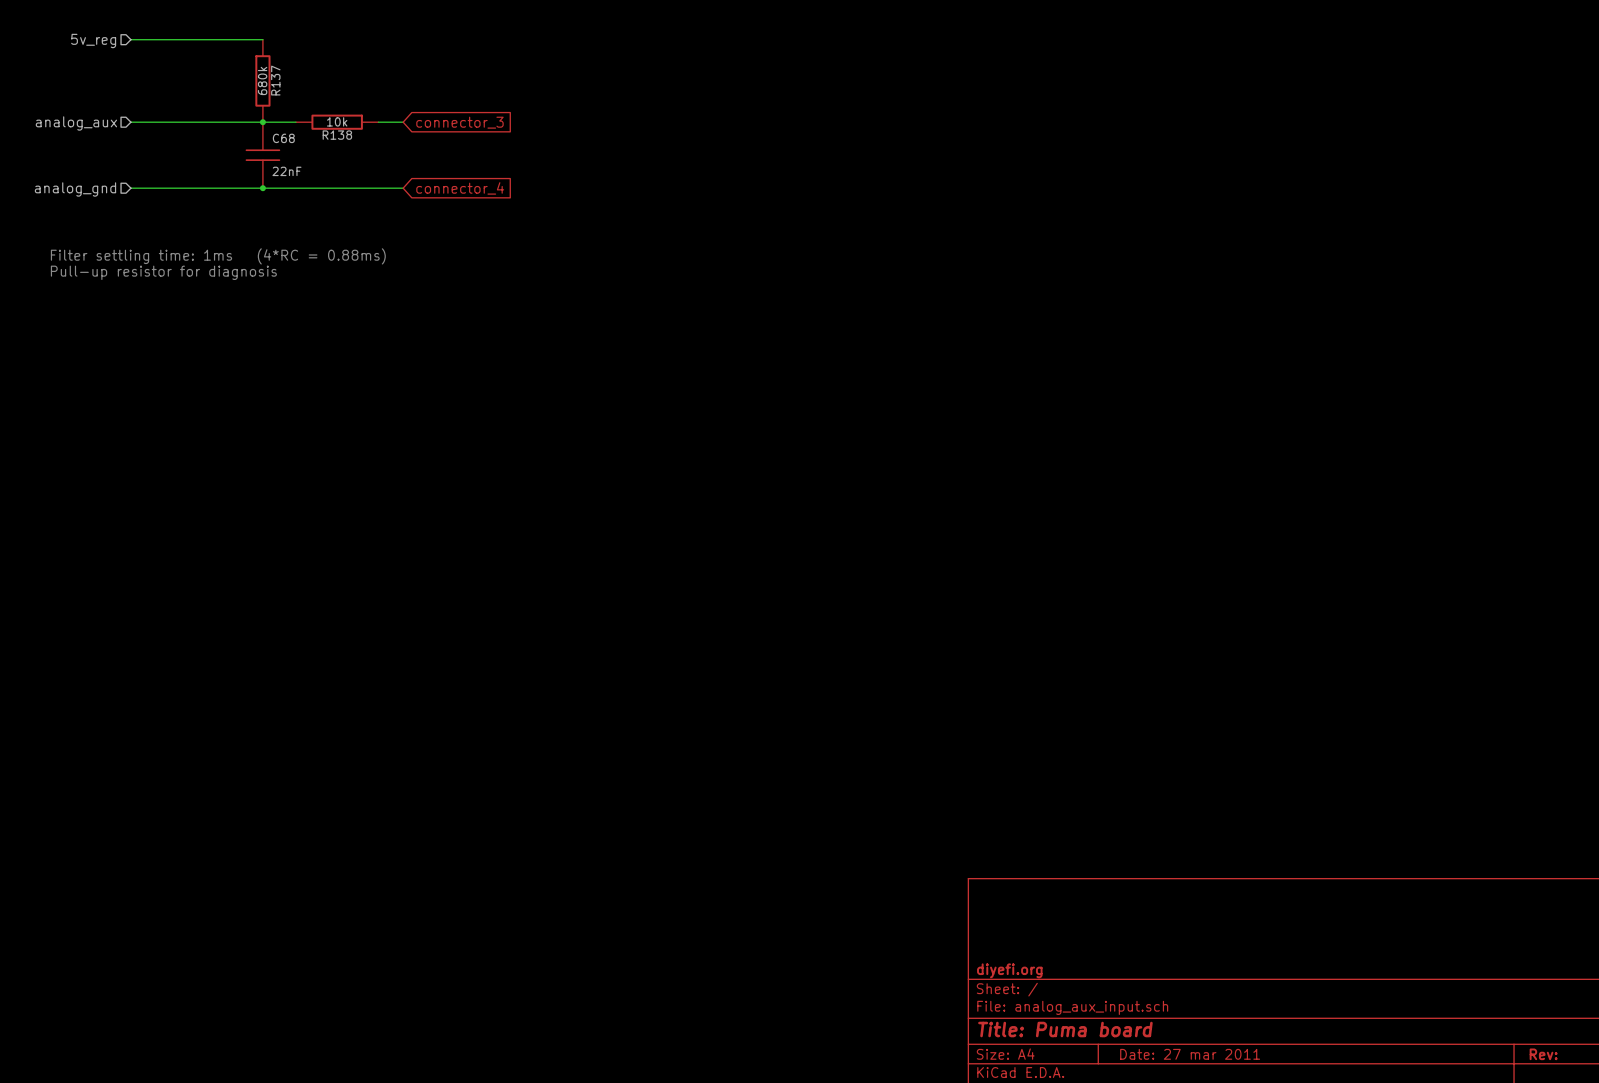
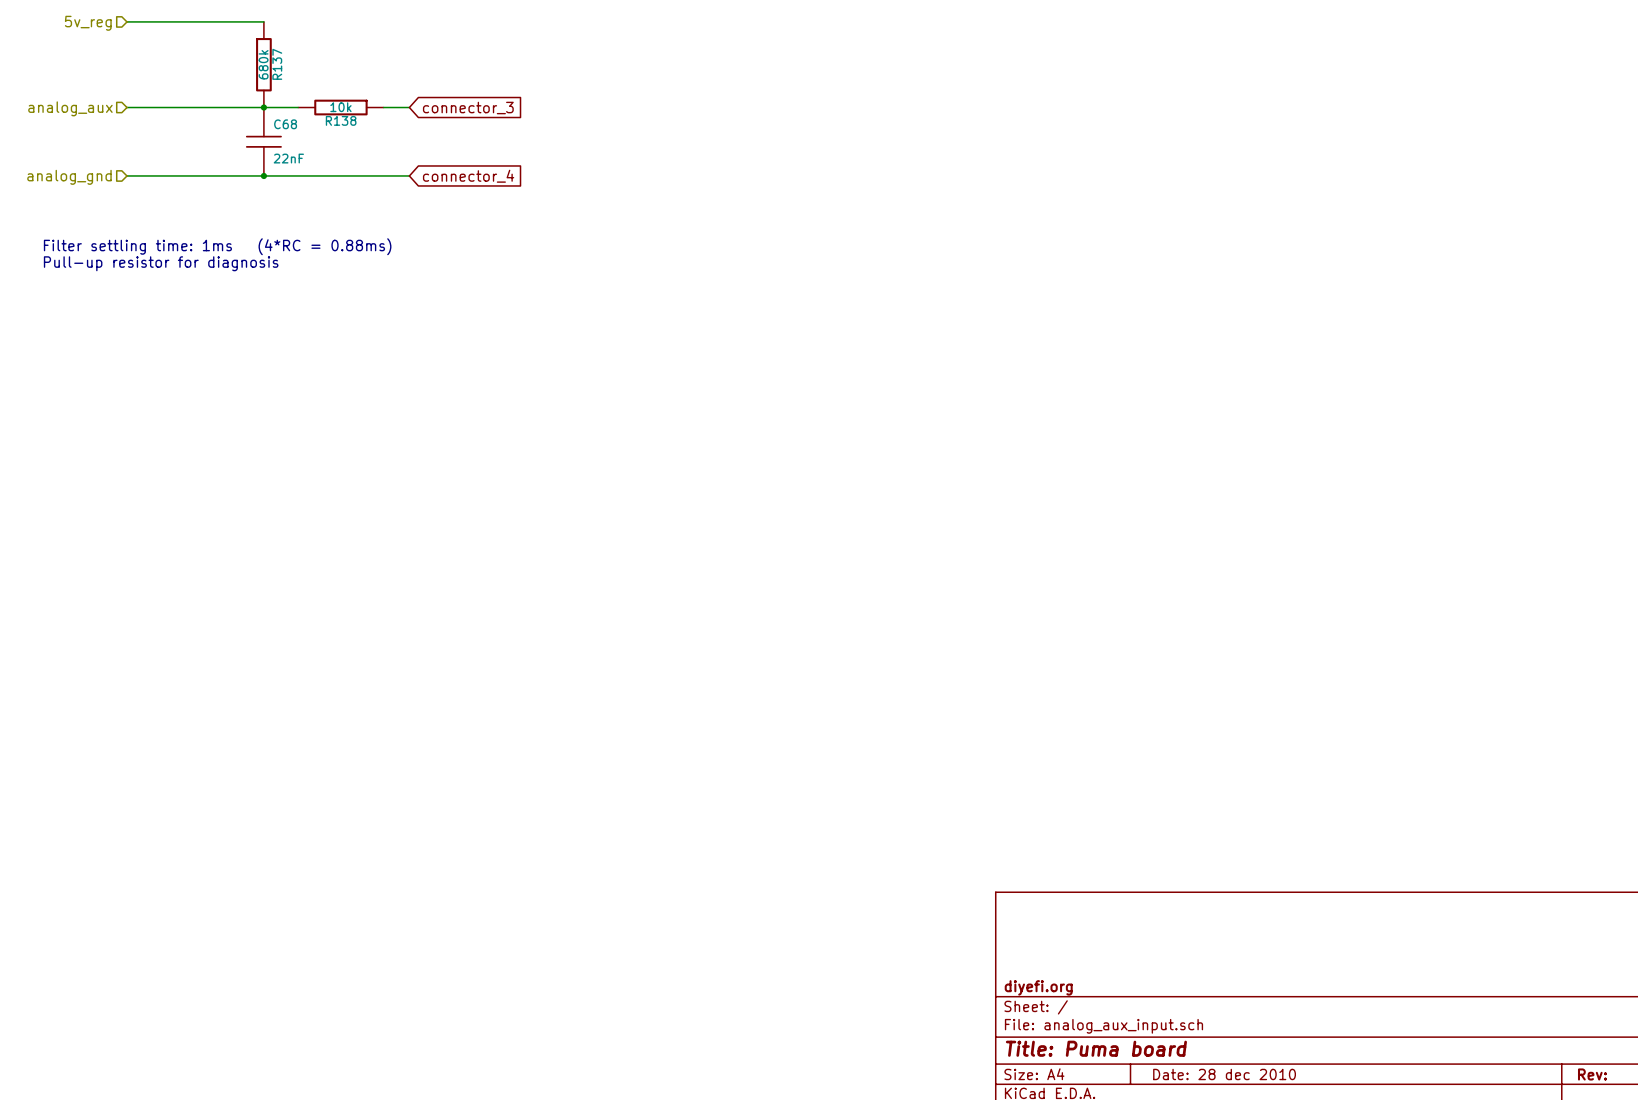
title block: Date: 27 mar 2011 (1190, 1054) -> Date: 28 dec 2010 (1224, 1074)

